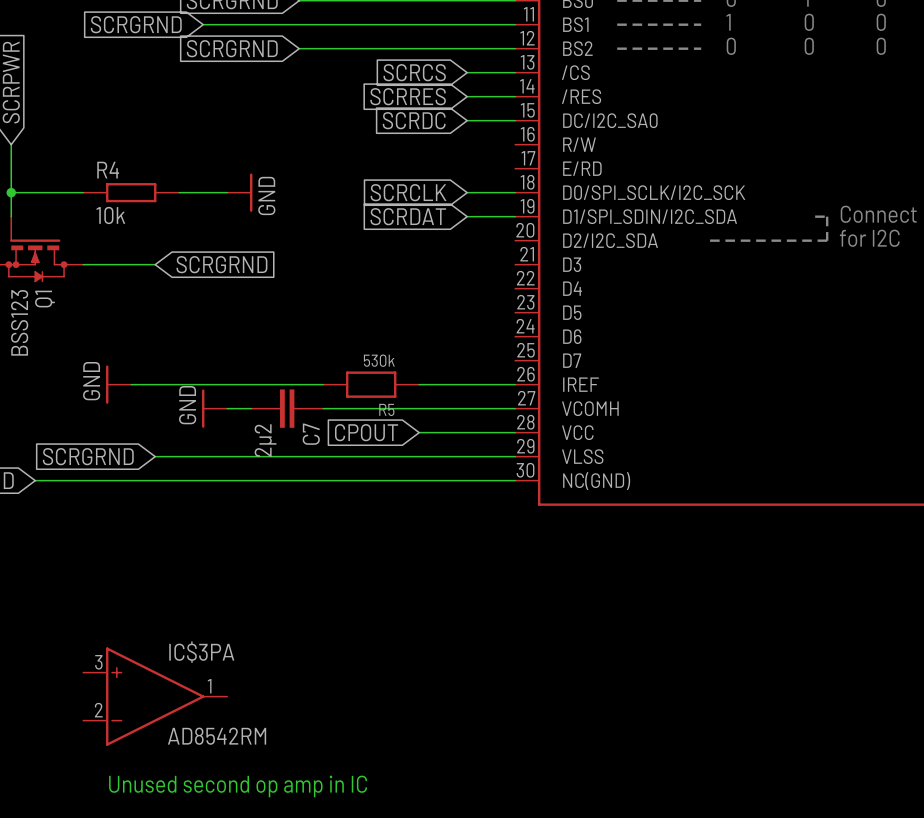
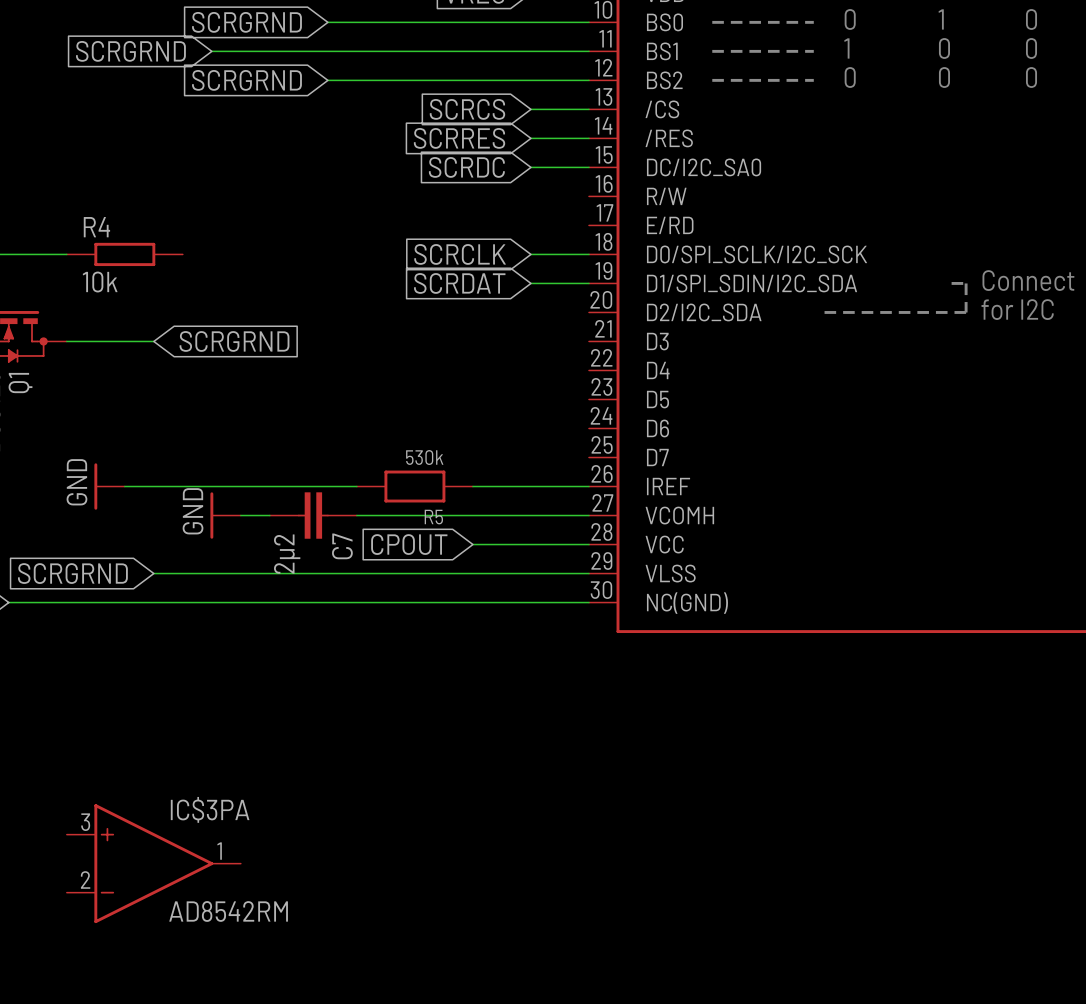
wire: (179, 192) (227, 192) -> none
power symbol: GND (239, 192) -> none
text: Unused second op amp in IC (238, 786) -> none

